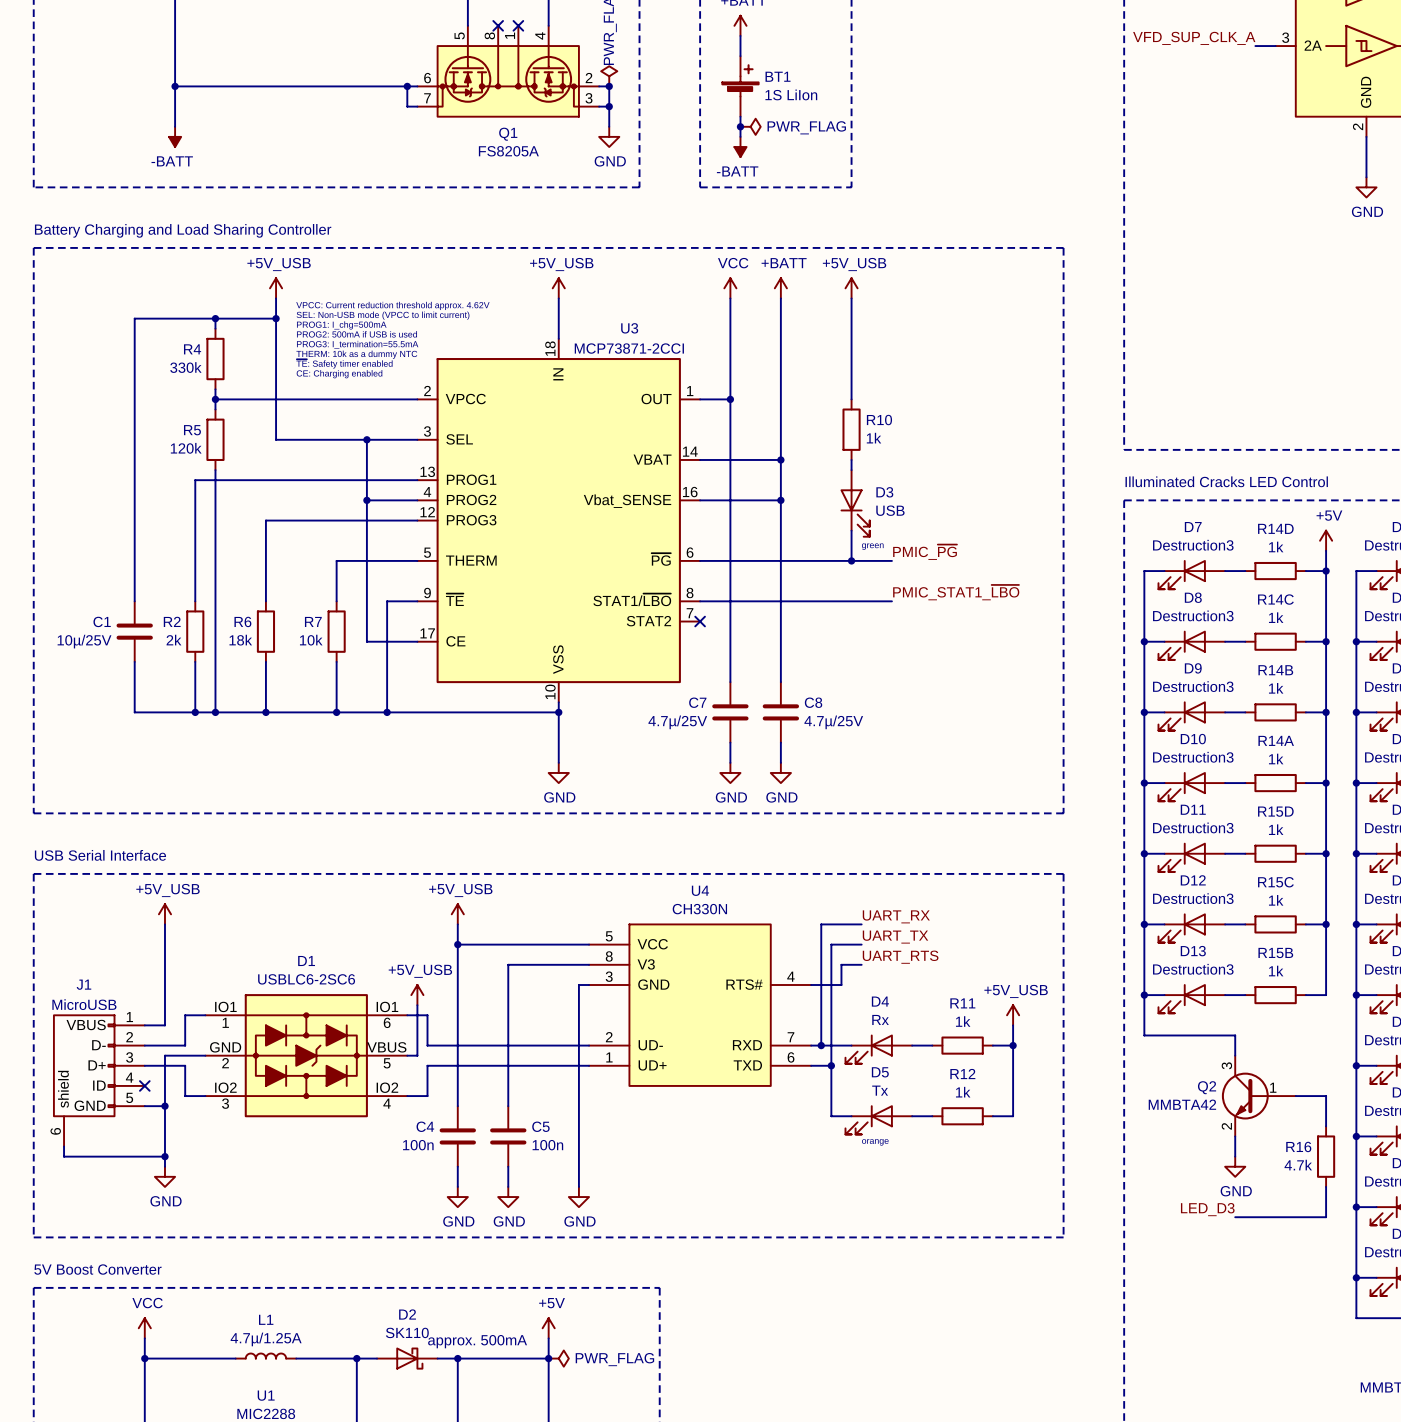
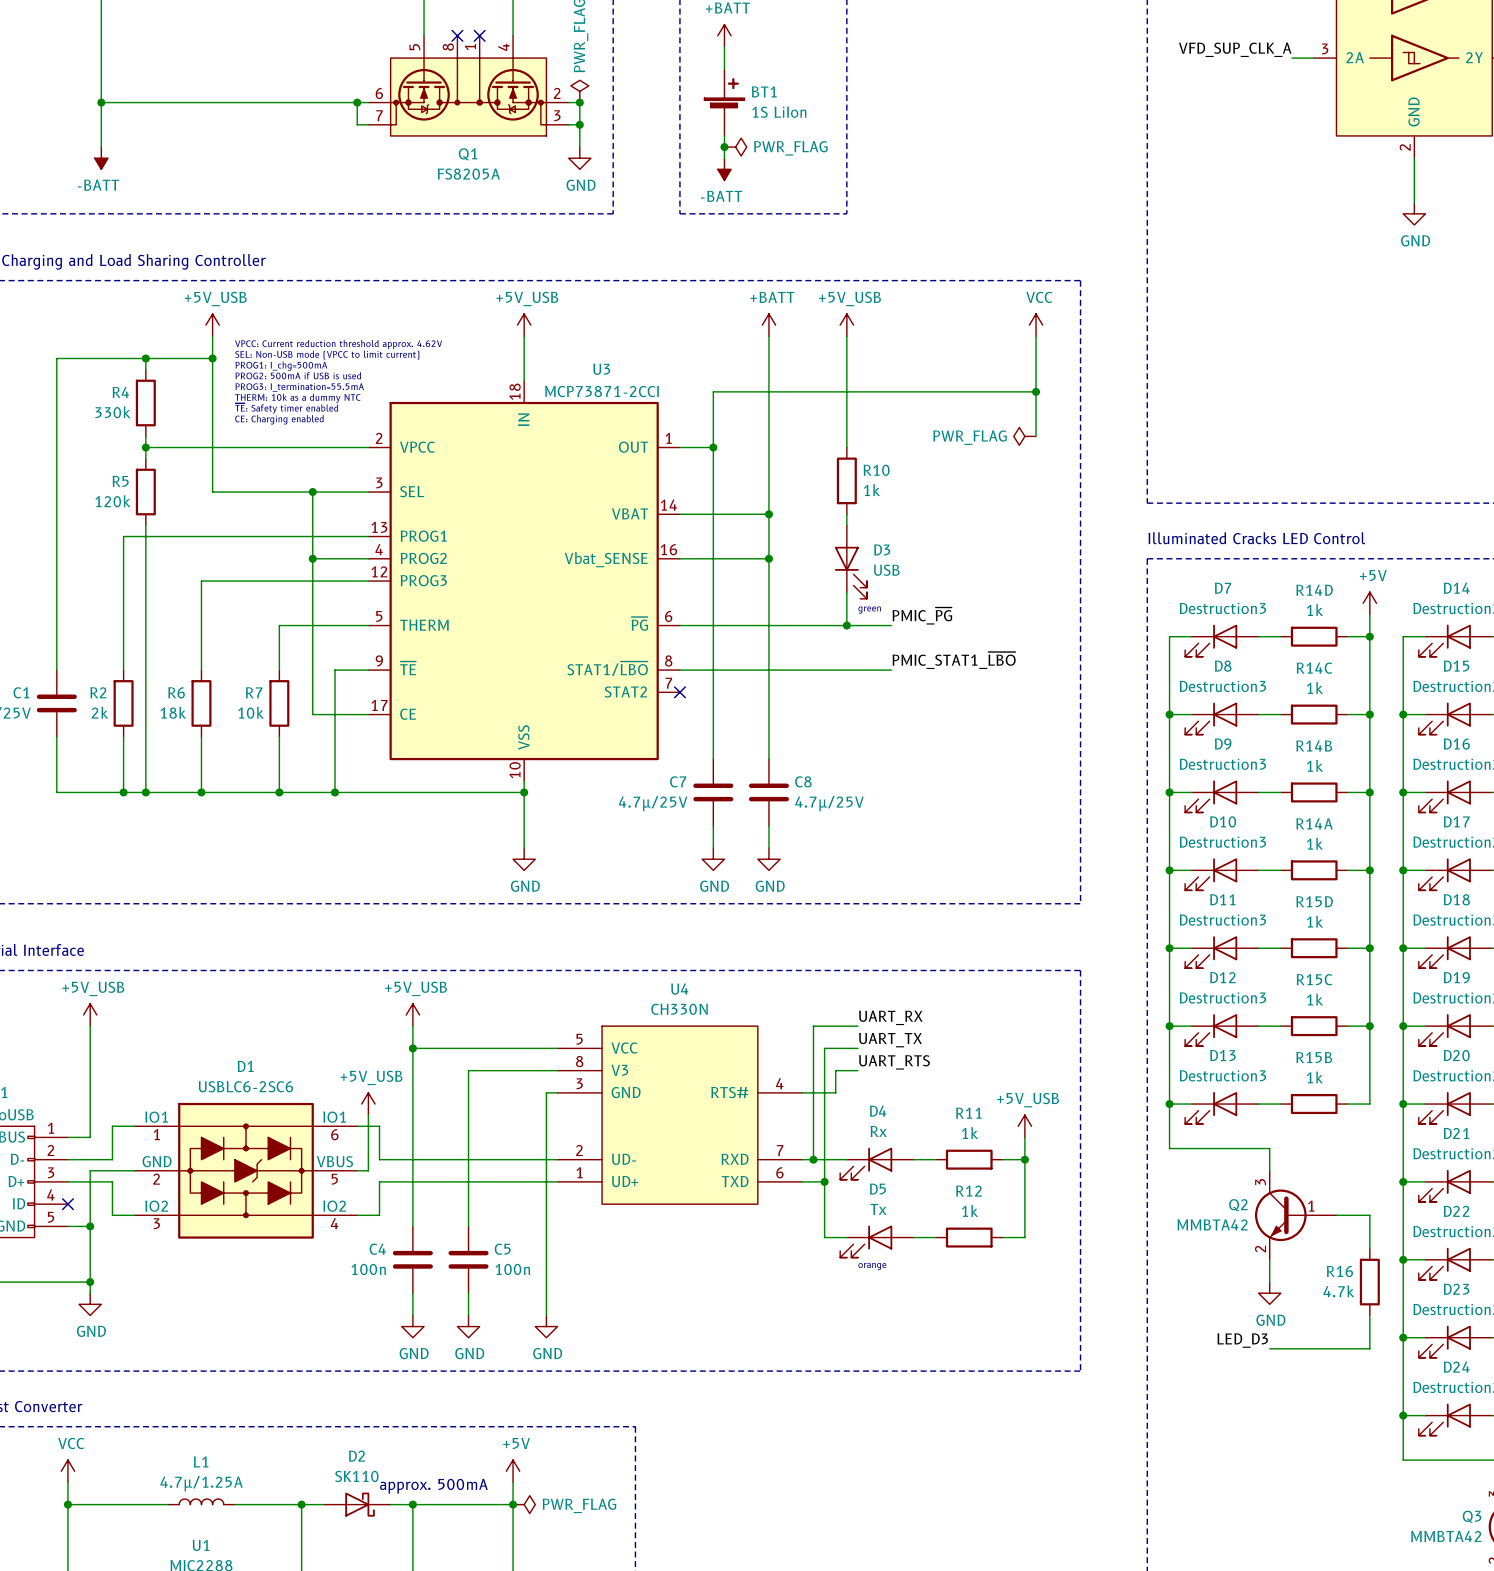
power symbol: VCC (730, 288) -> none
power symbol: none -> VCC (1036, 325)
wire: (730, 298) (730, 348) -> (1036, 391) (713, 391)
wire: none -> (1036, 336) (1036, 436)
junction: none -> (1036, 391)
power symbol: none -> PWR_FLAG (1024, 436)

